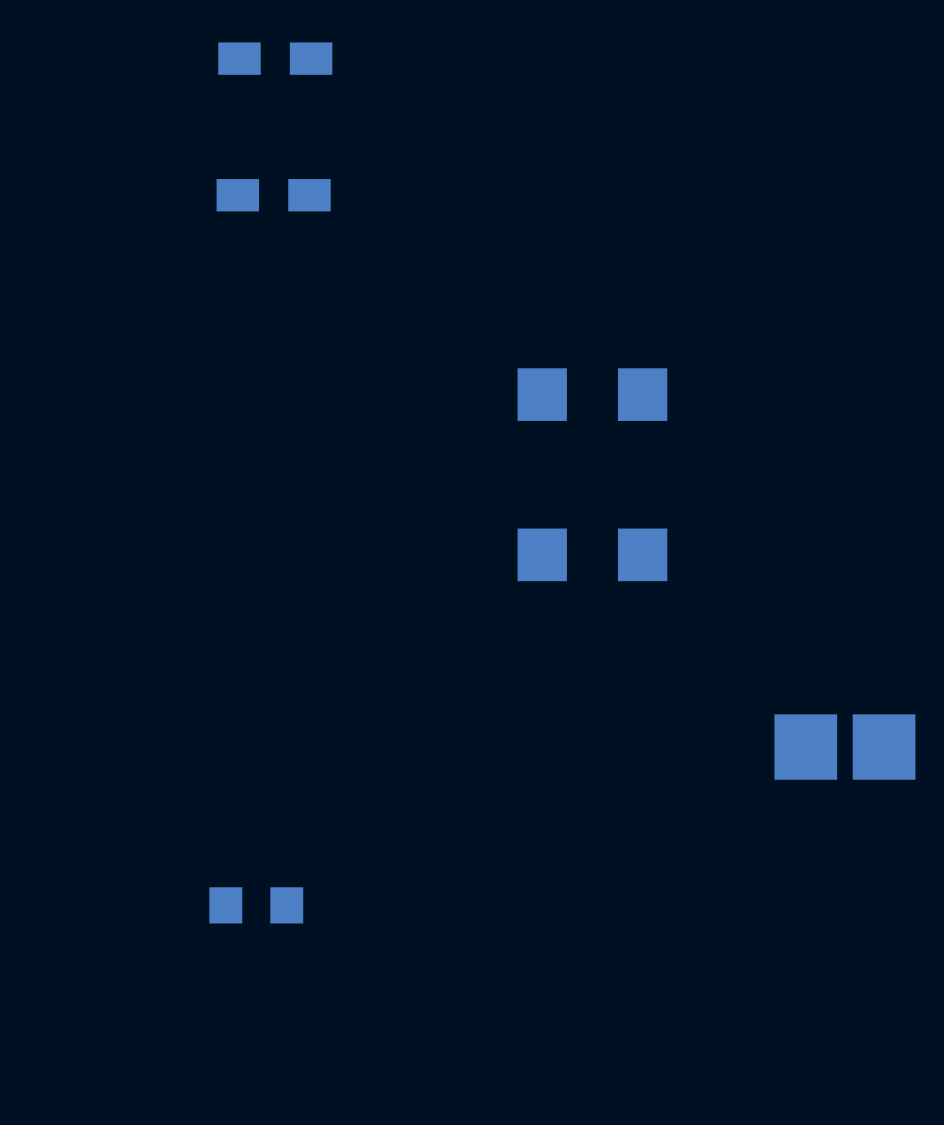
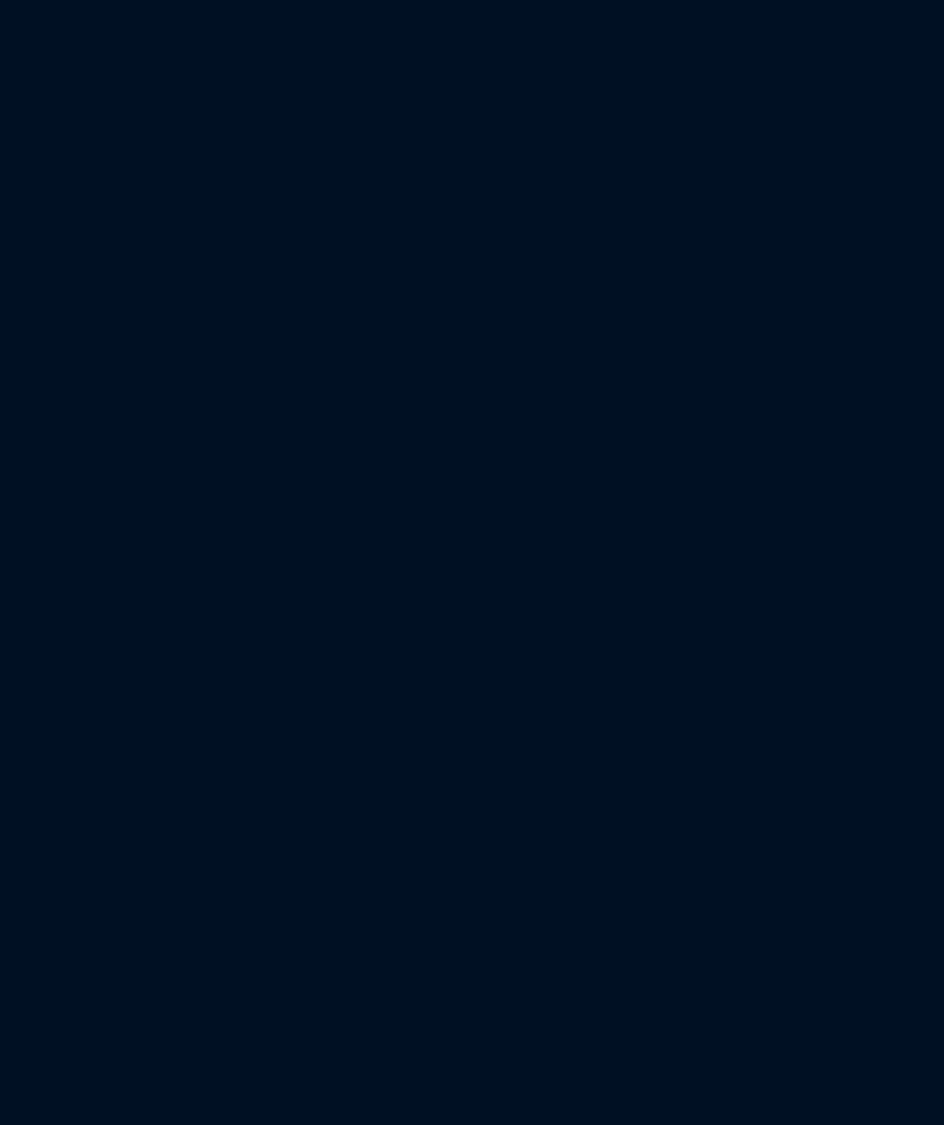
part: (275, 58) -> none
part: (273, 195) -> none
part: (592, 394) -> none
part: (592, 554) -> none
part: (844, 747) -> none
part: (256, 905) -> none

